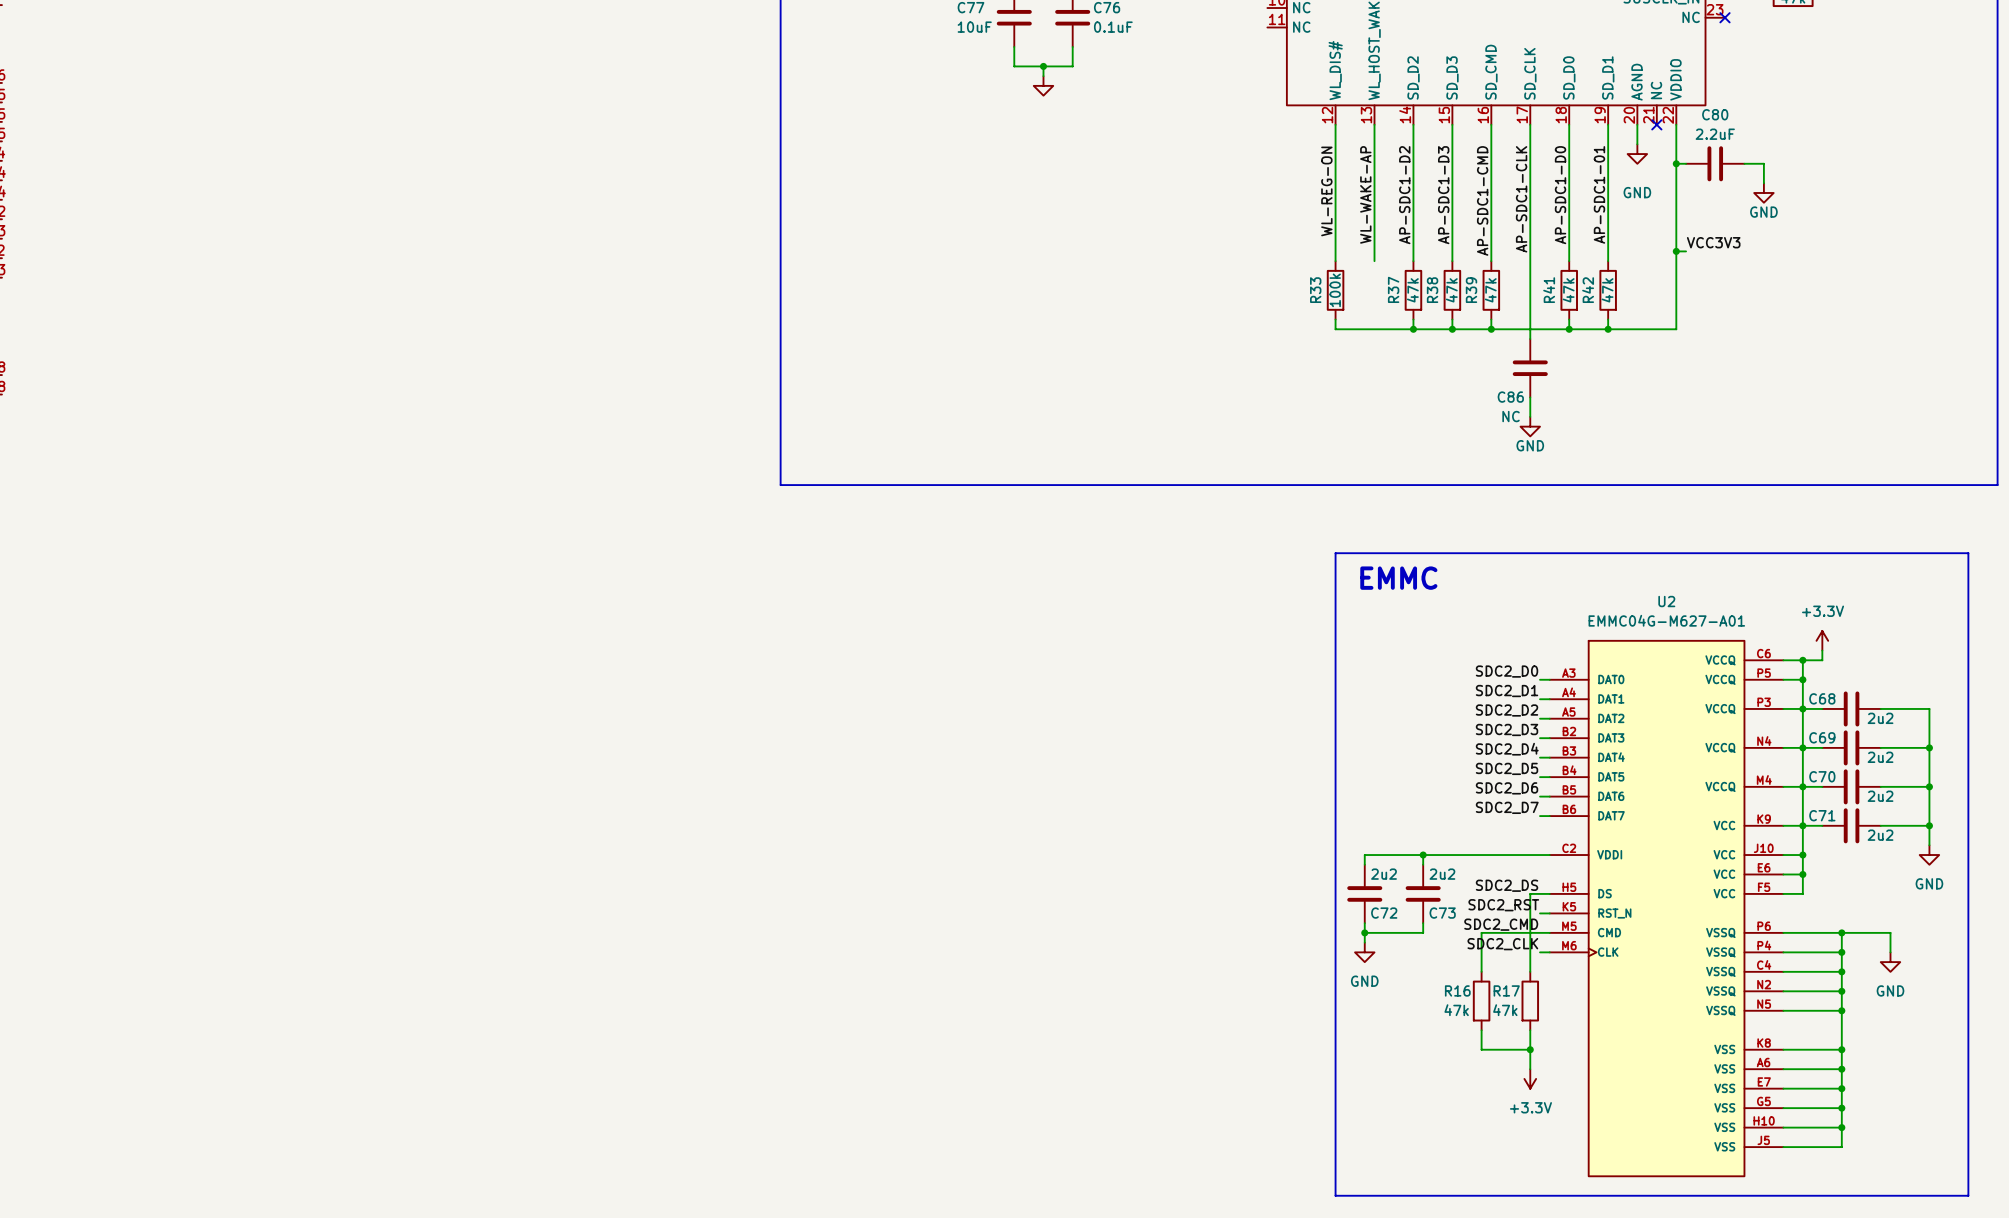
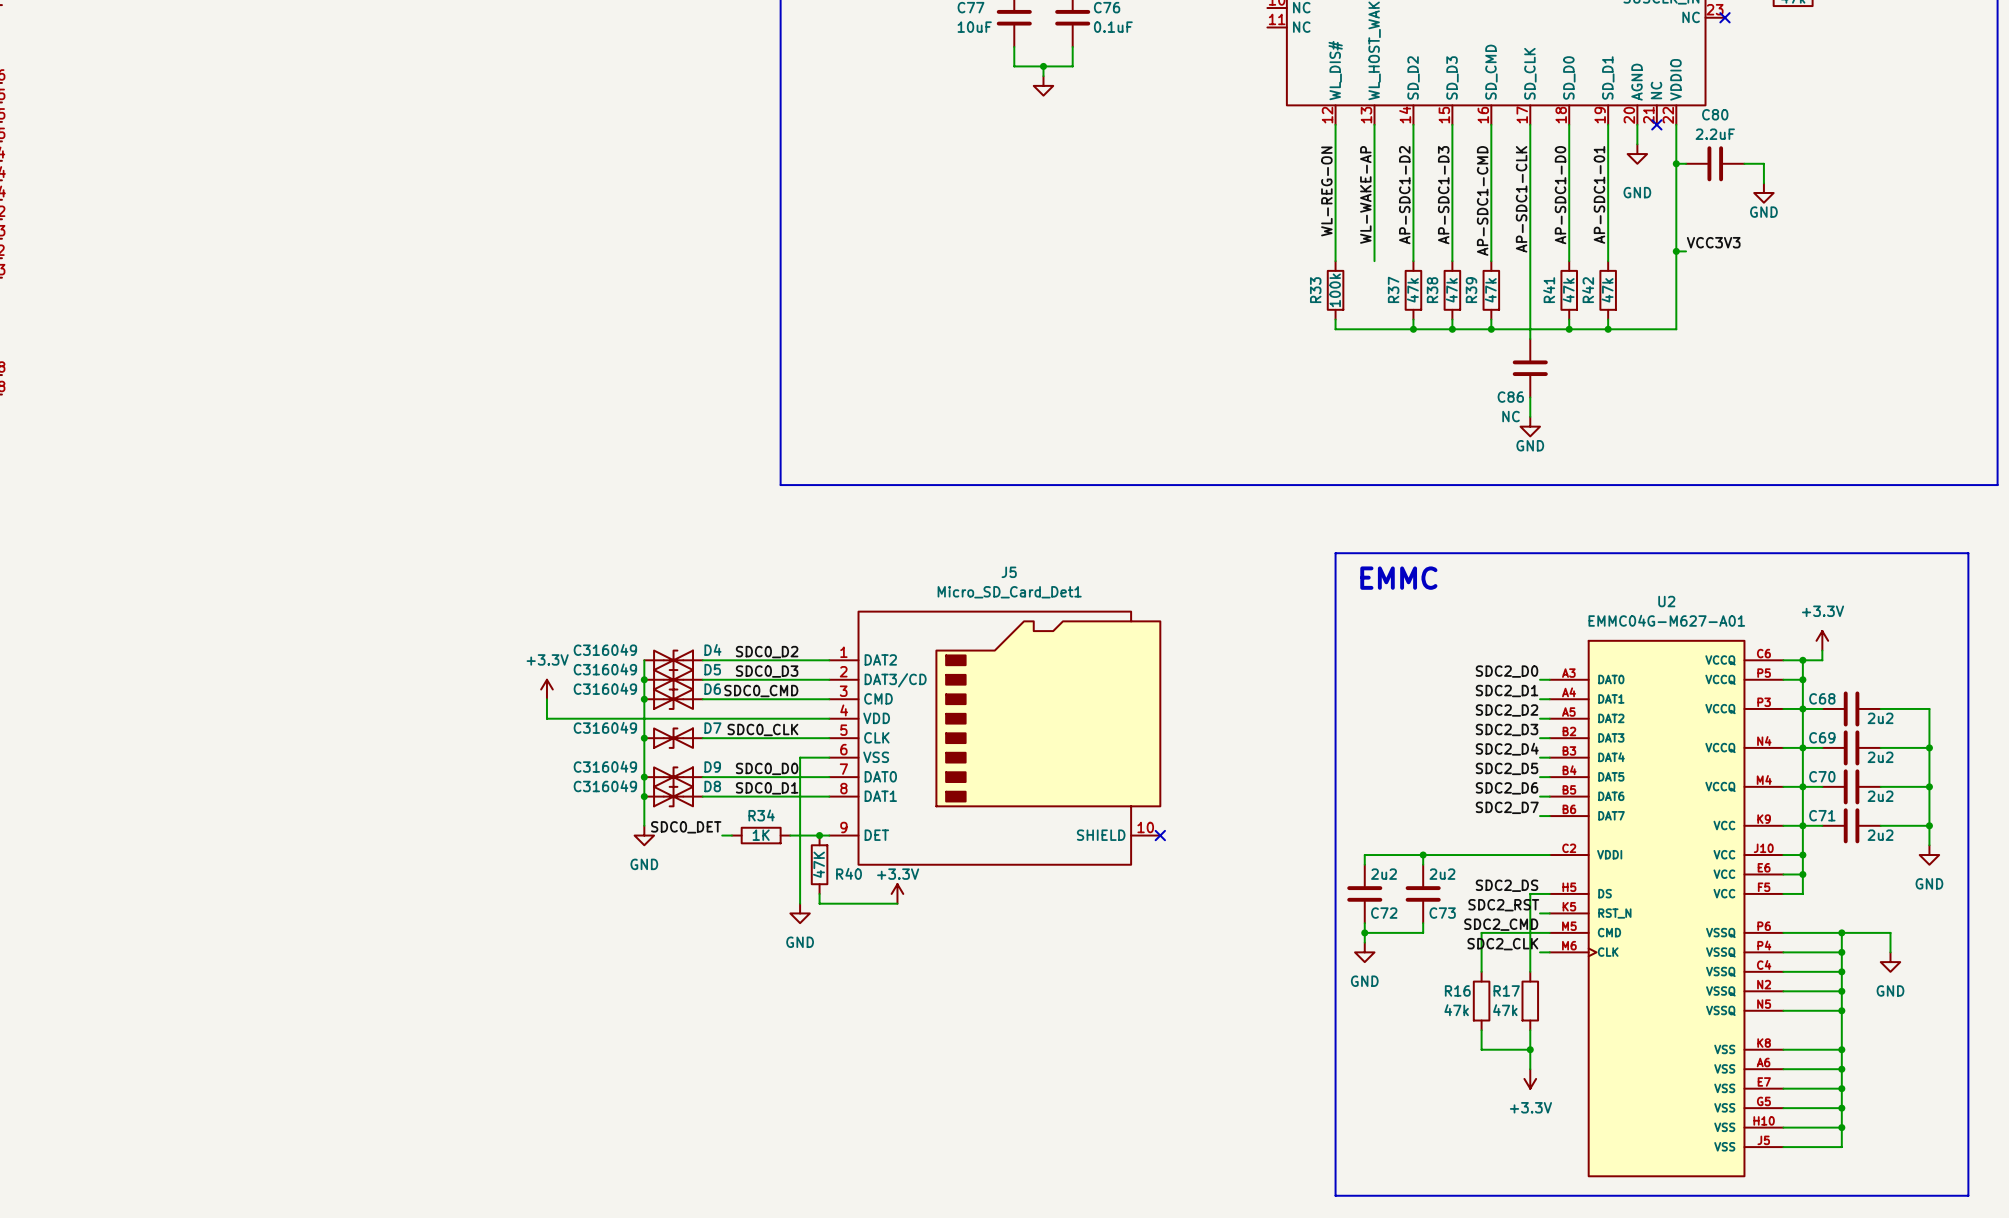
label: none -> SDC0_D2 (767, 652)
wire: none -> (644, 660) (644, 825)
D4: none -> C316049 (673, 660)
wire: none -> (702, 660) (829, 660)
label: none -> SDC0_D3 (767, 671)
junction: none -> (644, 679)
D5: none -> C316049 (673, 679)
wire: none -> (702, 679) (829, 679)
power symbol: none -> +3.3V (546, 689)
label: none -> SDC0_CMD (761, 691)
wire: none -> (546, 699) (546, 718) (829, 718)
junction: none -> (644, 699)
D6: none -> C316049 (673, 699)
wire: none -> (702, 699) (829, 699)
label: none -> SDC0_CLK (762, 729)
junction: none -> (644, 738)
D7: none -> C316049 (673, 738)
wire: none -> (702, 738) (829, 738)
J5: none -> Micro_SD_Card_Det1 (995, 738)
wire: none -> (829, 757) (800, 757) (800, 903)
label: none -> SDC0_D0 (767, 768)
junction: none -> (644, 777)
D9: none -> C316049 (673, 777)
wire: none -> (702, 777) (829, 777)
label: none -> SDC0_D1 (767, 788)
junction: none -> (644, 796)
D8: none -> C316049 (673, 796)
wire: none -> (702, 796) (829, 796)
label: none -> SDC0_DET (686, 827)
power symbol: none -> GND (644, 835)
wire: none -> (722, 835) (731, 835)
R34: none -> 1K (761, 835)
wire: none -> (790, 835) (829, 835)
junction: none -> (819, 835)
no-connect mark: none -> (1160, 835)
R40: none -> 47K (819, 864)
wire: none -> (819, 893) (819, 903) (897, 903)
power symbol: none -> +3.3V (897, 893)
power symbol: none -> GND (800, 913)

